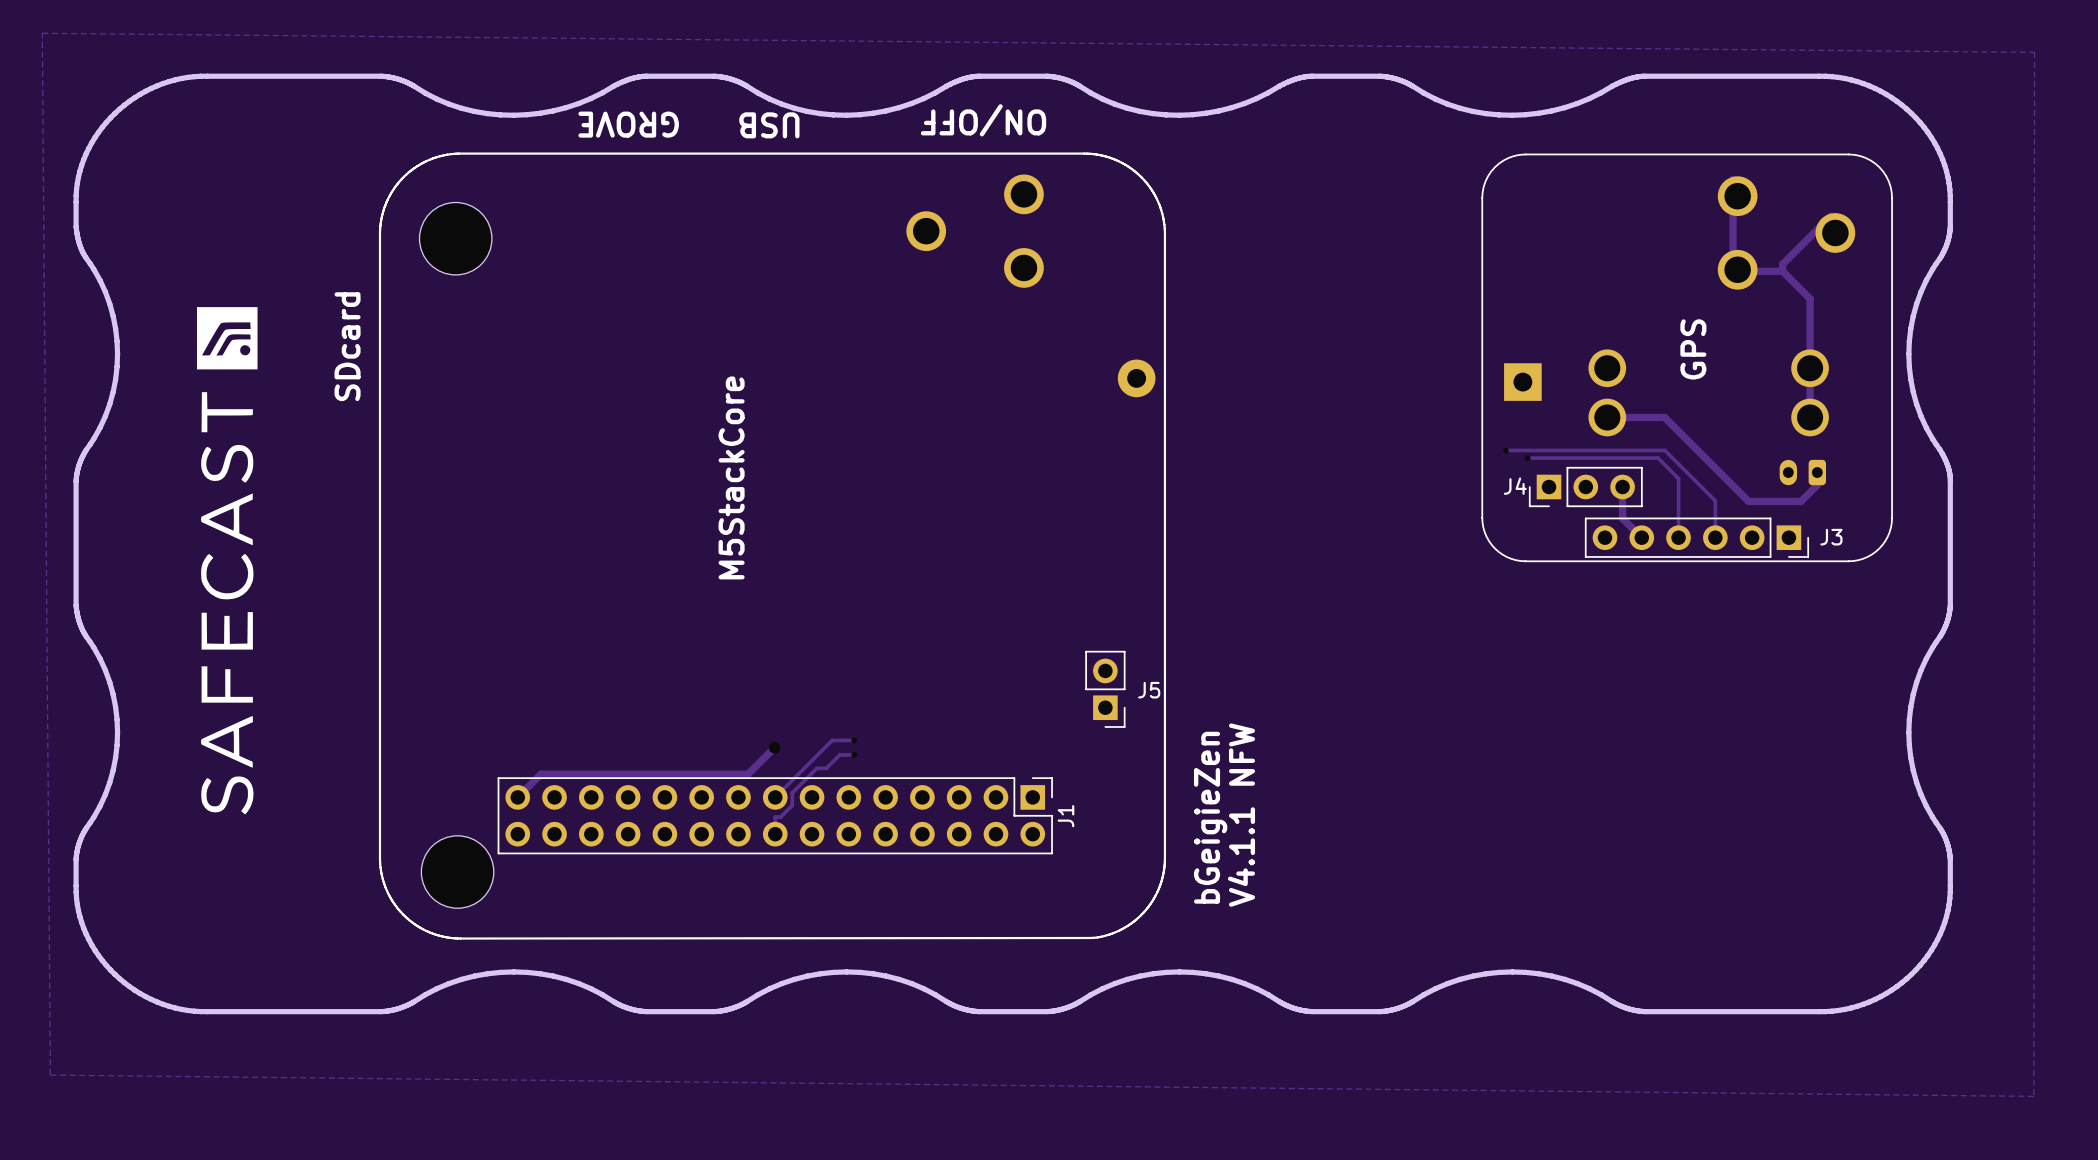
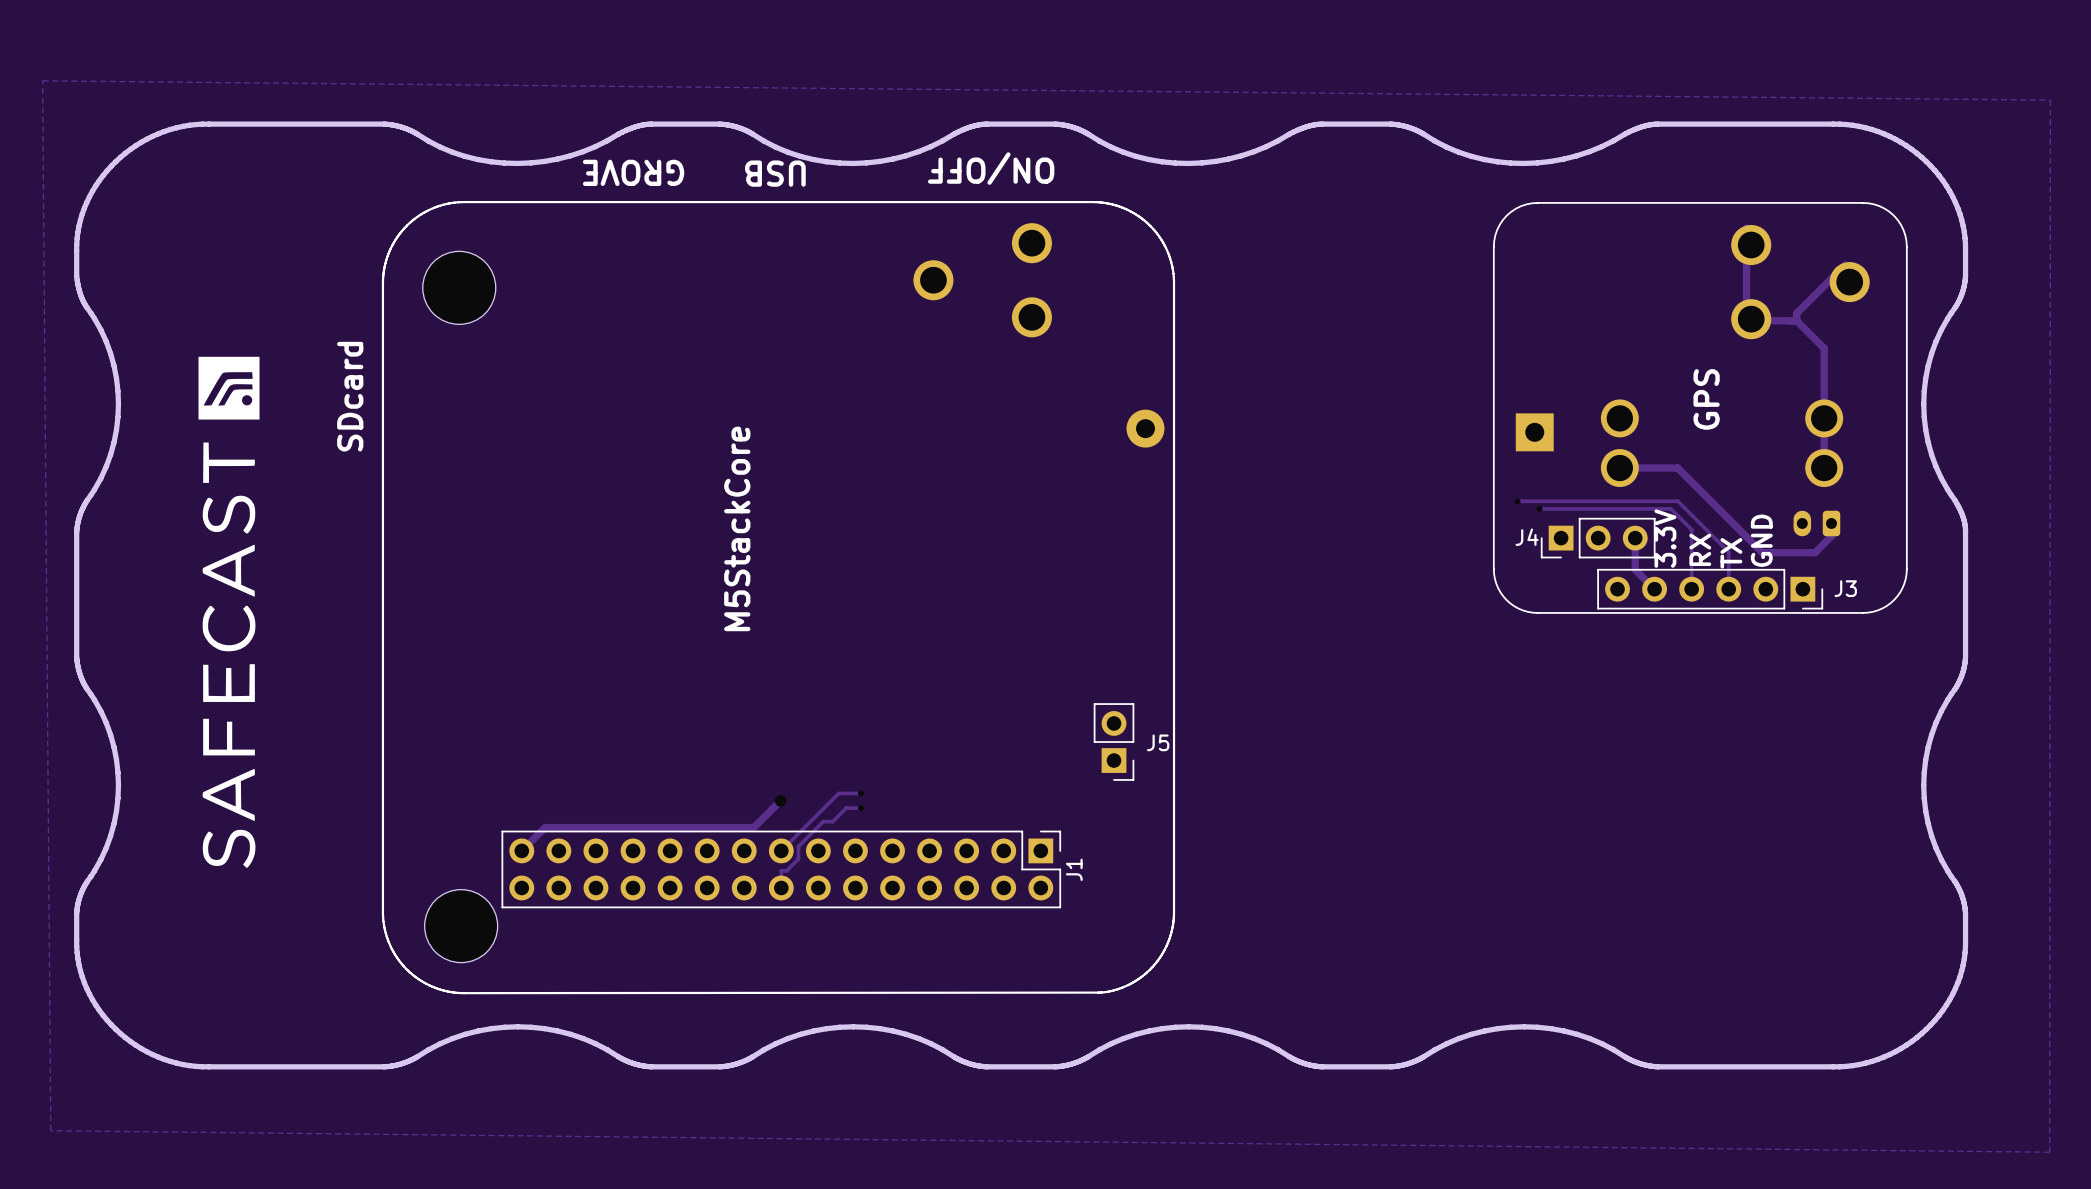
text: none -> 3.3V (1665, 538)
text: none -> GND (1761, 540)
text: none -> RX (1700, 549)
text: none -> TX (1731, 553)
text: V4.1.1 NFW (1241, 815) -> none
text: bGeigieZen (1210, 817) -> none

